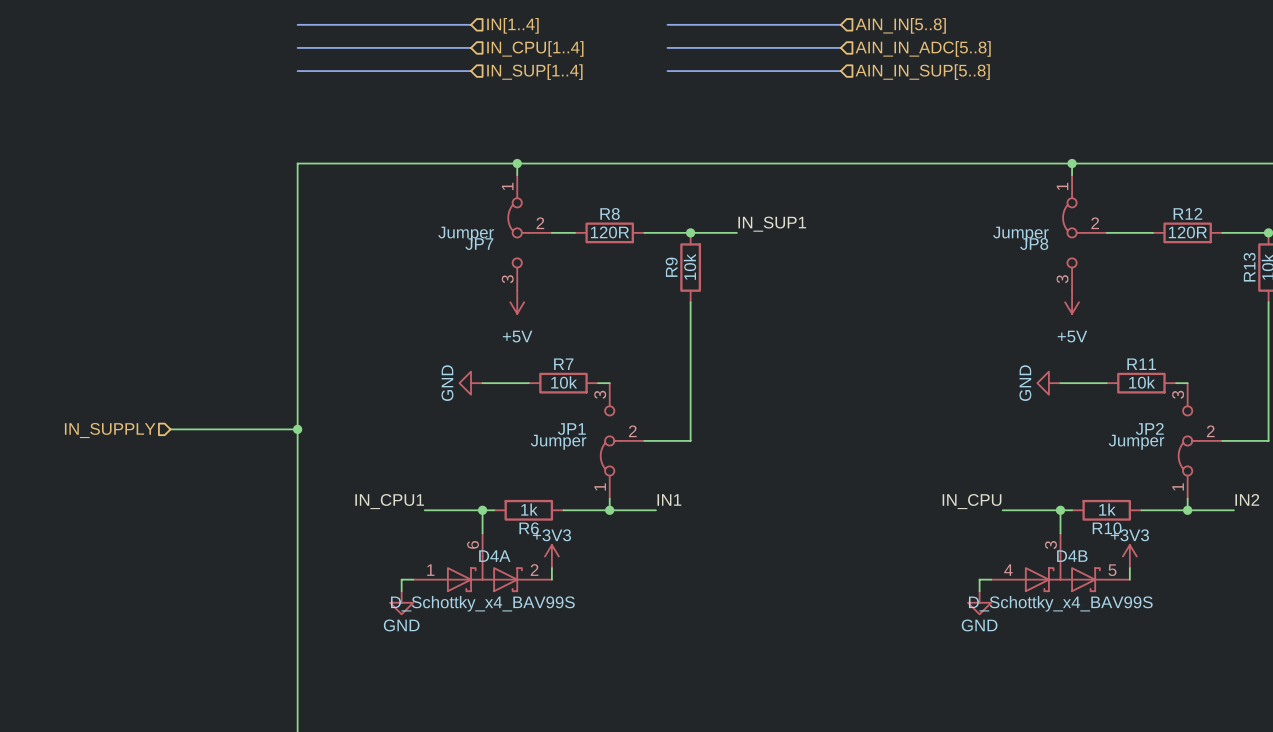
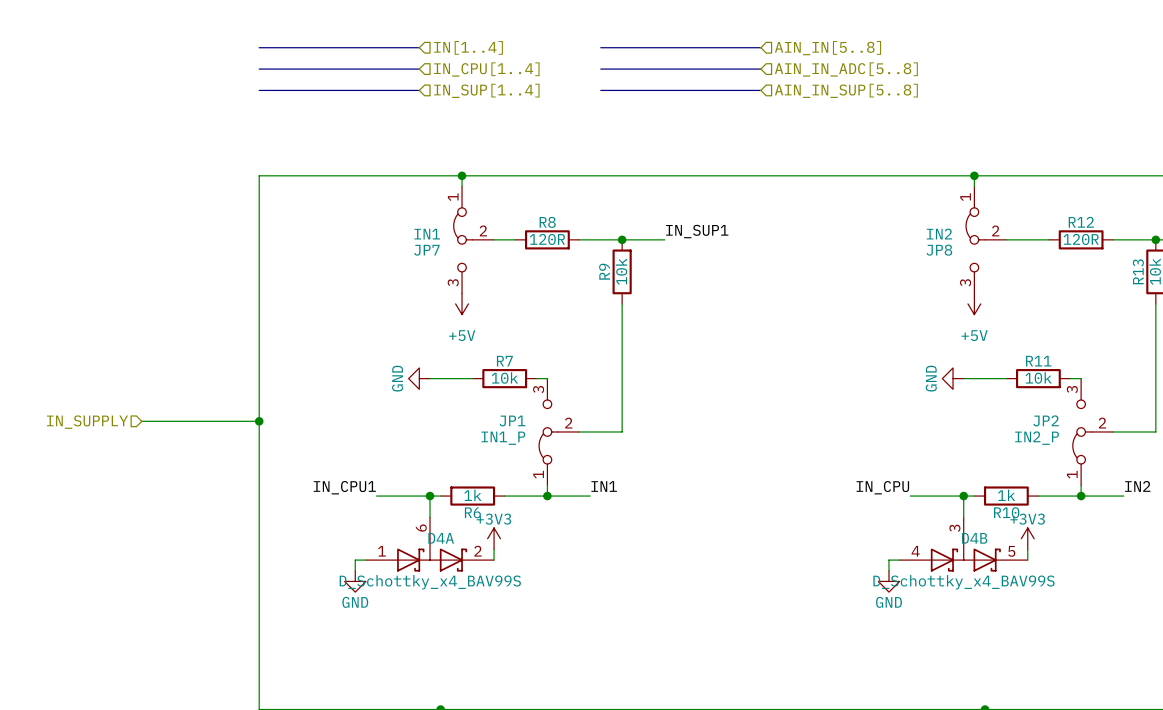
JP7 value: Jumper (466, 234) -> IN1 (427, 234)
JP8 value: Jumper (1020, 234) -> IN2 (939, 234)
JP1 value: Jumper (558, 442) -> IN1_P (503, 438)
JP2 value: Jumper (1136, 442) -> IN2_P (1037, 438)

